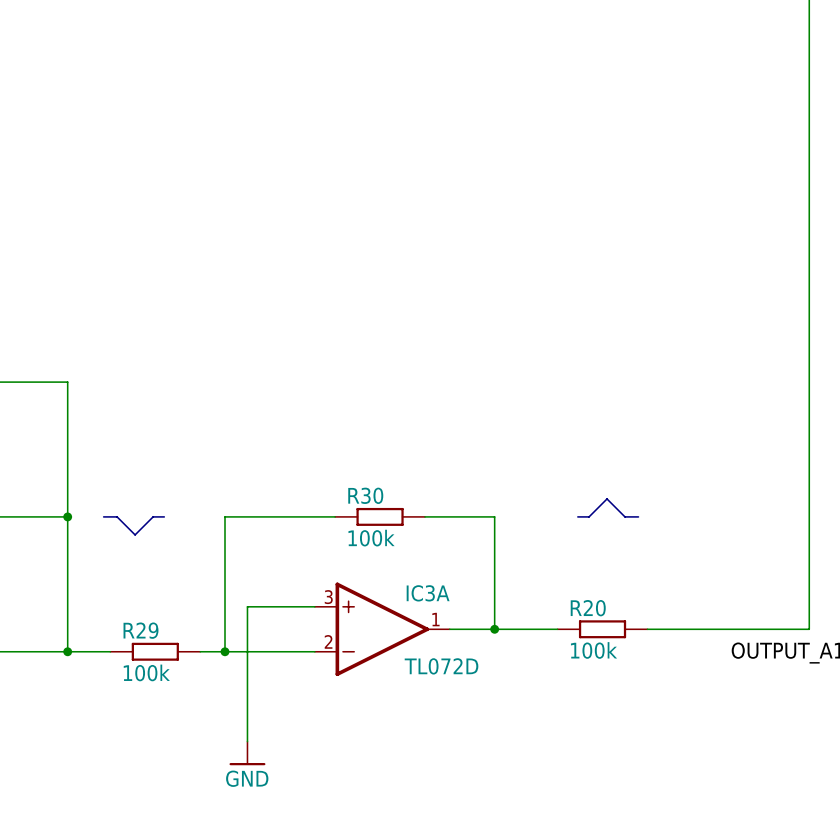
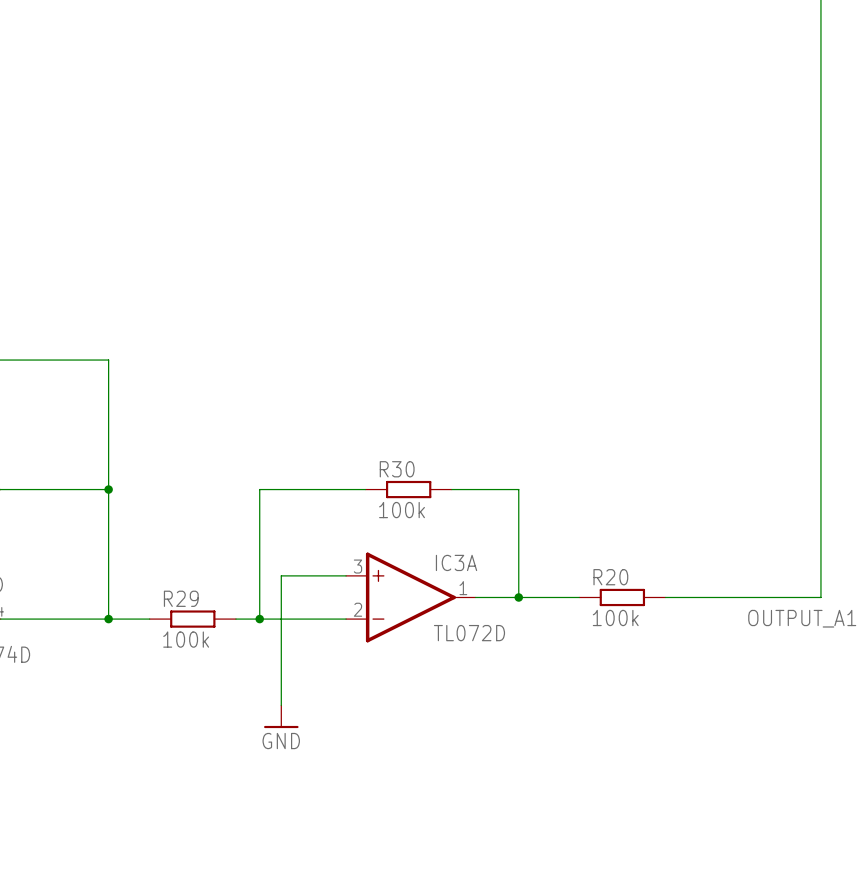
line: (103, 516) (117, 516) (135, 534) (153, 516) (164, 516) -> none
line: (577, 516) (589, 516) (607, 498) (625, 516) (638, 516) -> none

